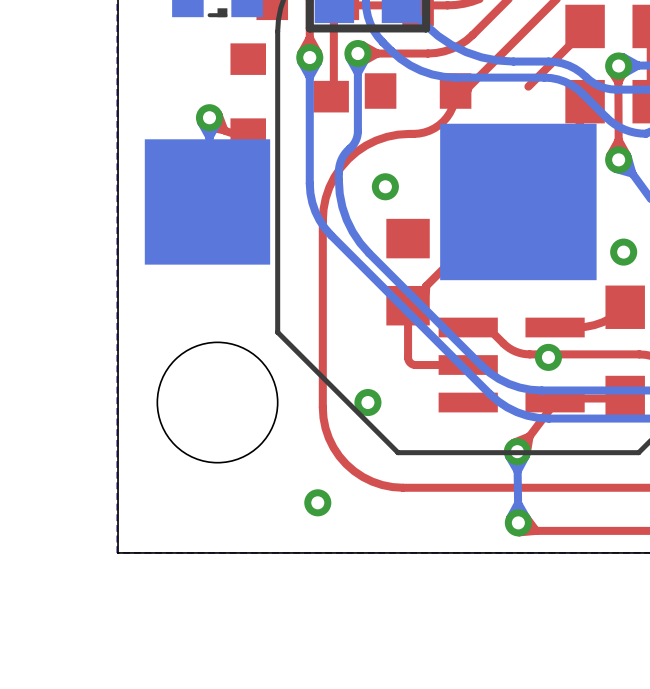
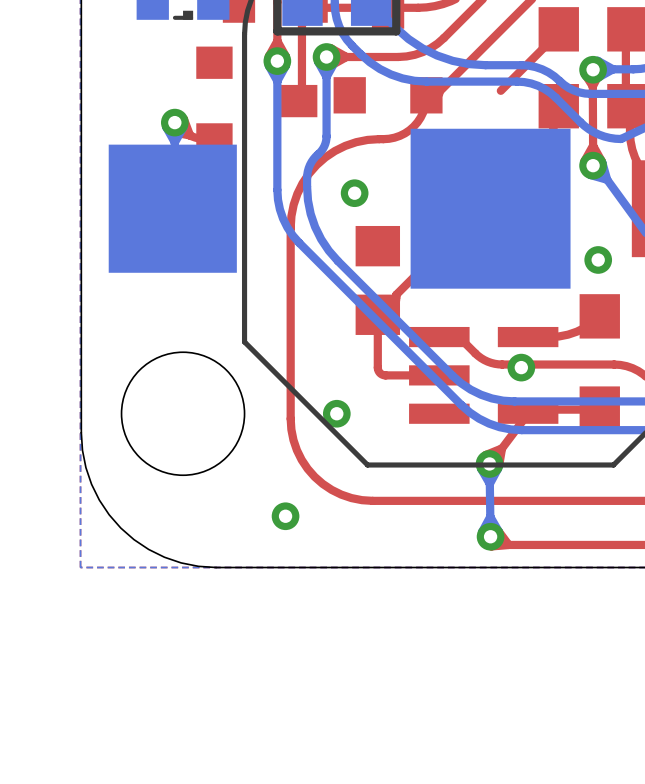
board edge: (118, 421) (118, 552) (249, 552) -> (81, 432) (85, 467) (91, 484) (99, 500) (120, 528) (148, 549) (164, 557) (181, 562) (216, 567)

